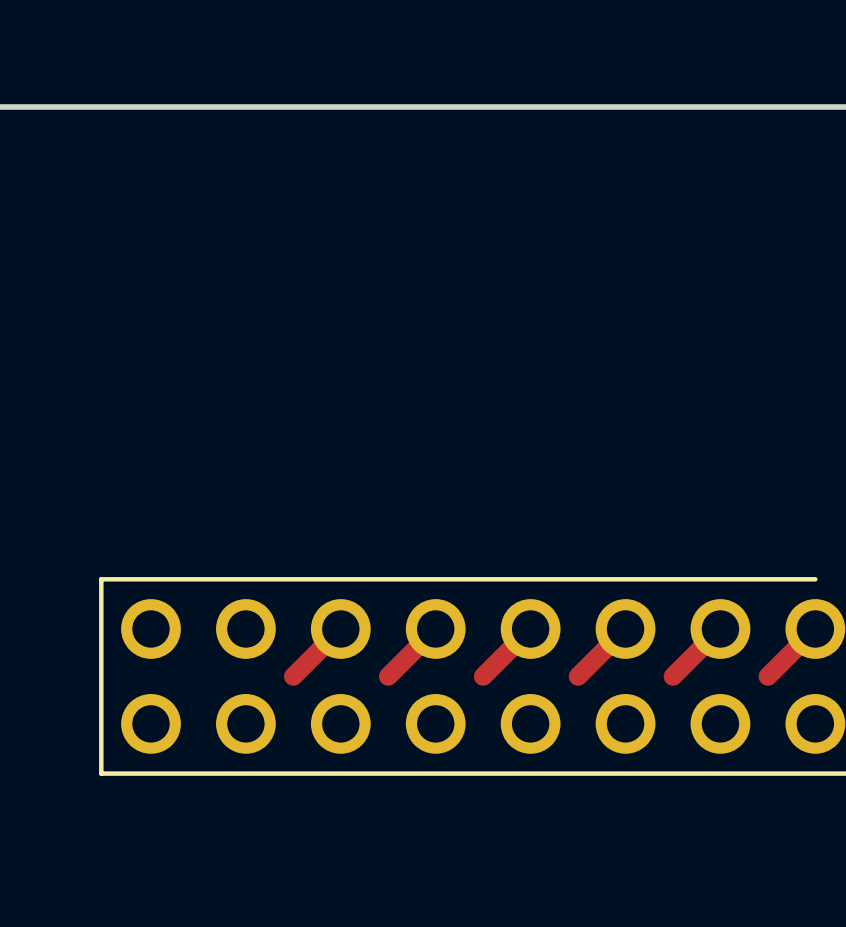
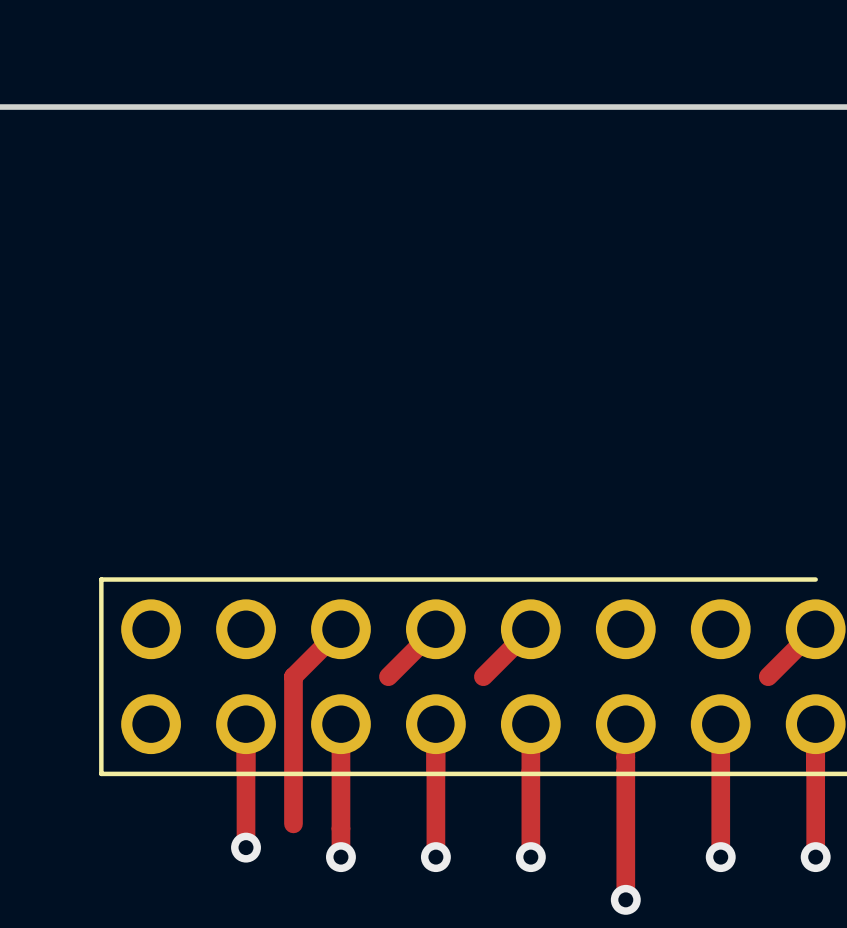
track: (625, 628) (578, 676) -> none
track: (720, 628) (672, 676) -> none
track: none -> (293, 676) (293, 823)
track: none -> (246, 724) (246, 847)
track: none -> (340, 724) (340, 857)
track: none -> (435, 724) (435, 857)
track: none -> (530, 724) (530, 857)
track: none -> (625, 724) (625, 899)
track: none -> (720, 724) (720, 857)
track: none -> (815, 724) (815, 857)
via: none -> (246, 847)
via: none -> (340, 857)
via: none -> (435, 857)
via: none -> (530, 857)
via: none -> (720, 857)
via: none -> (815, 857)
via: none -> (625, 899)

